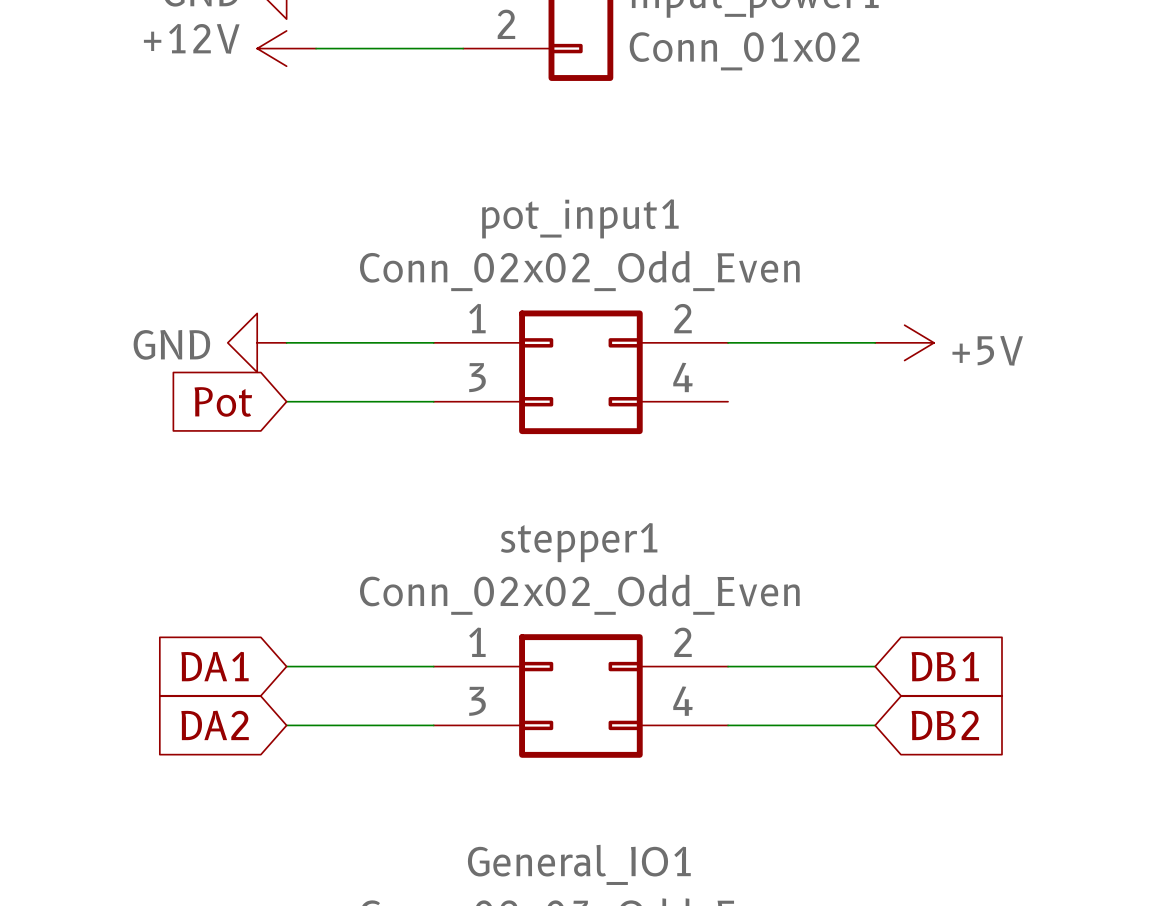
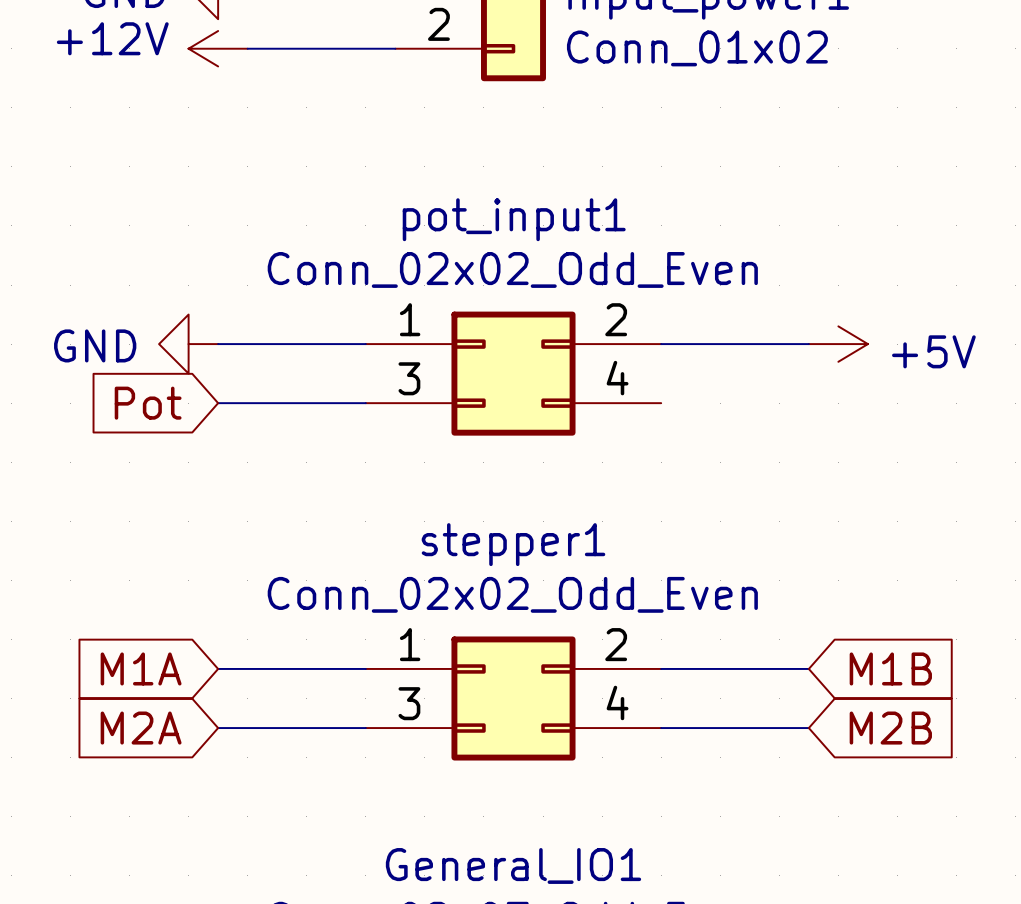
global label: DA1 (214, 666) -> M1A (141, 668)
global label: DB1 (945, 666) -> M1B (890, 668)
global label: DA2 (215, 725) -> M2A (141, 728)
global label: DB2 (945, 725) -> M2B (890, 728)

